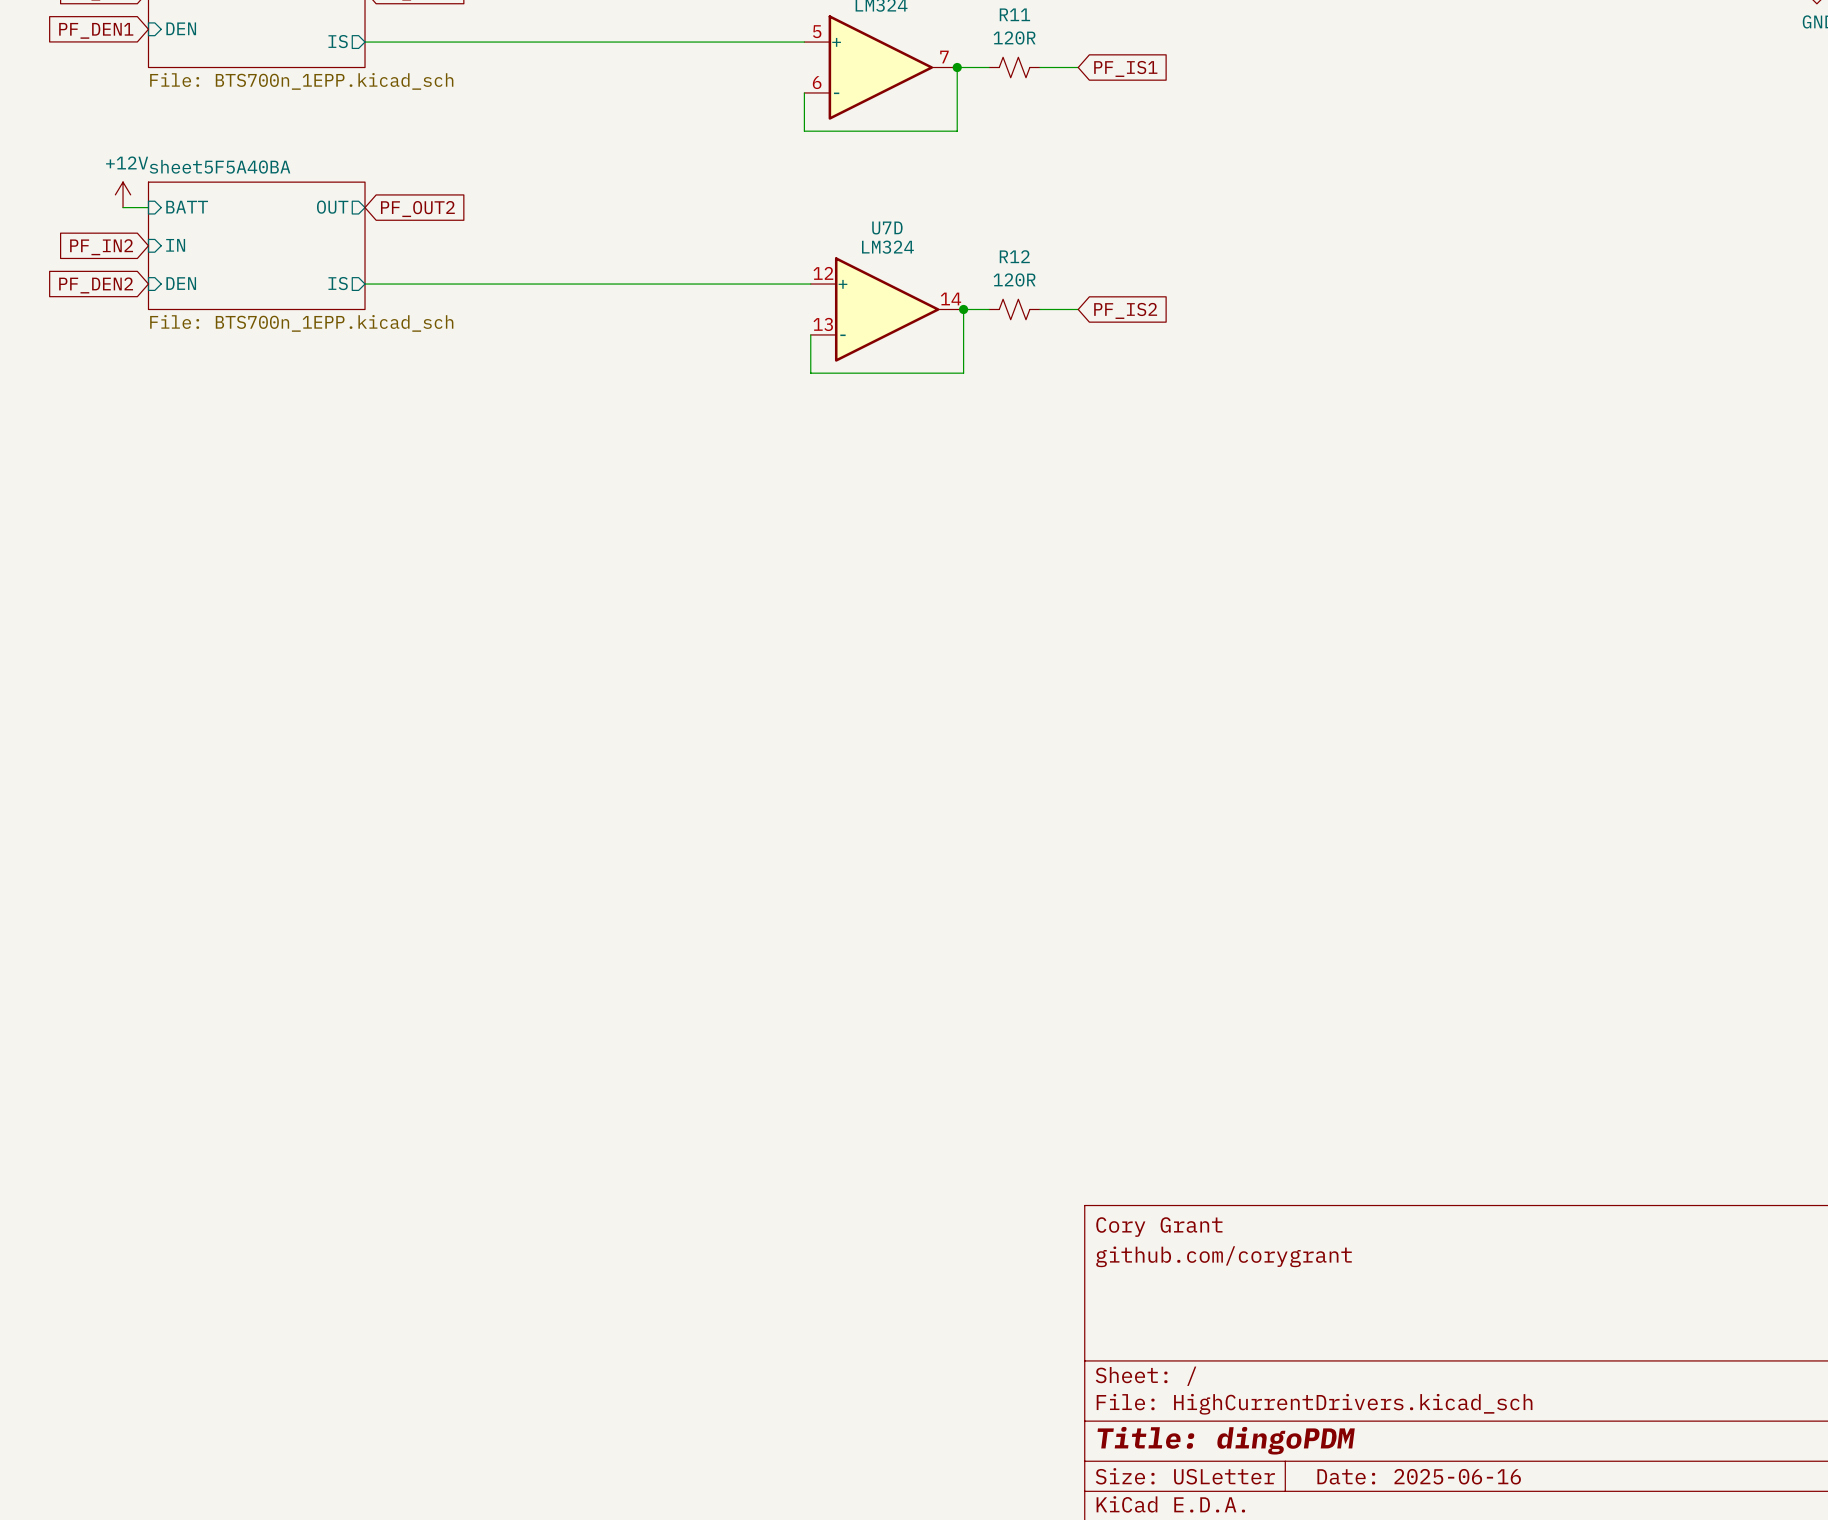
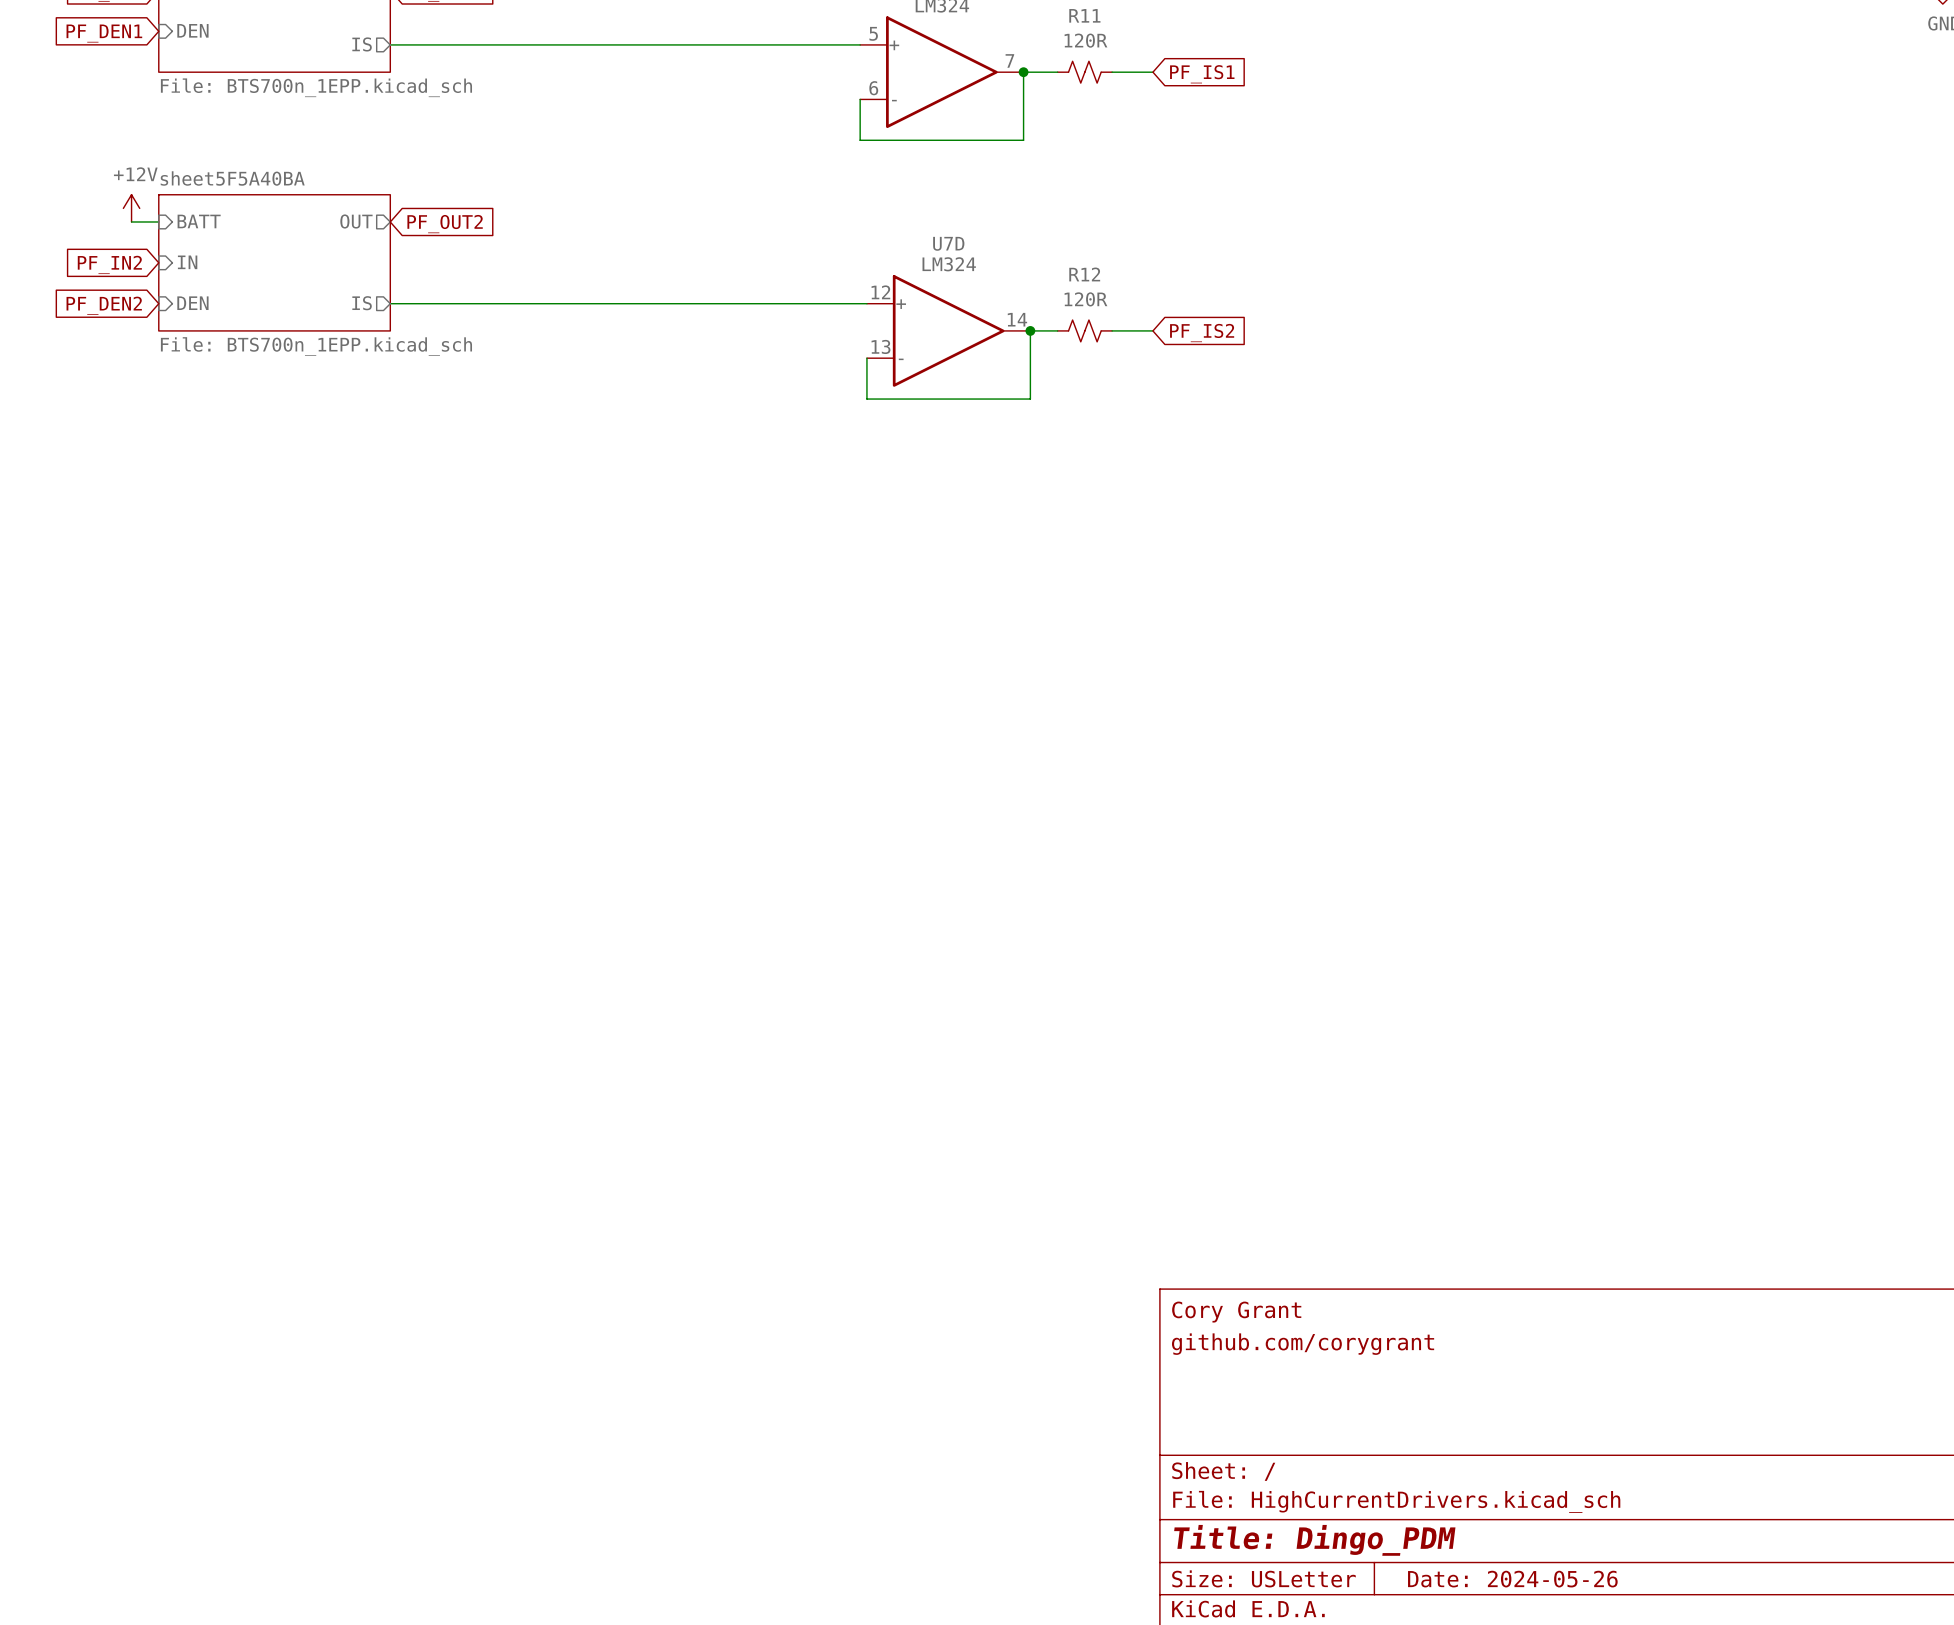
title block: Title: dingoPDM (1226, 1440) -> Title: Dingo_PDM (1314, 1540)
title block: Date: 2025-06-16 (1419, 1476) -> Date: 2024-05-26 (1512, 1579)

